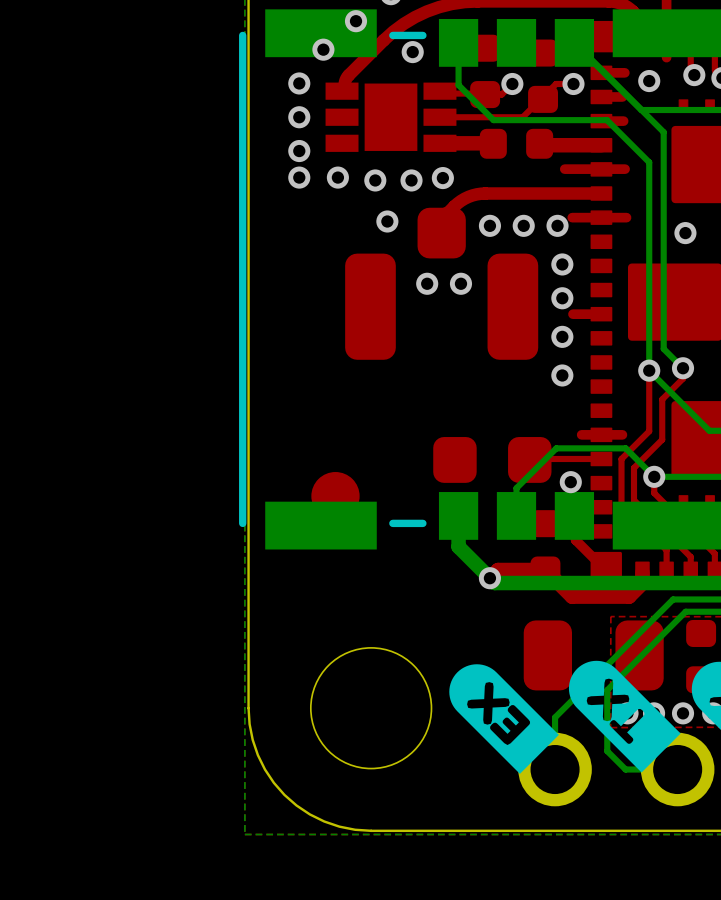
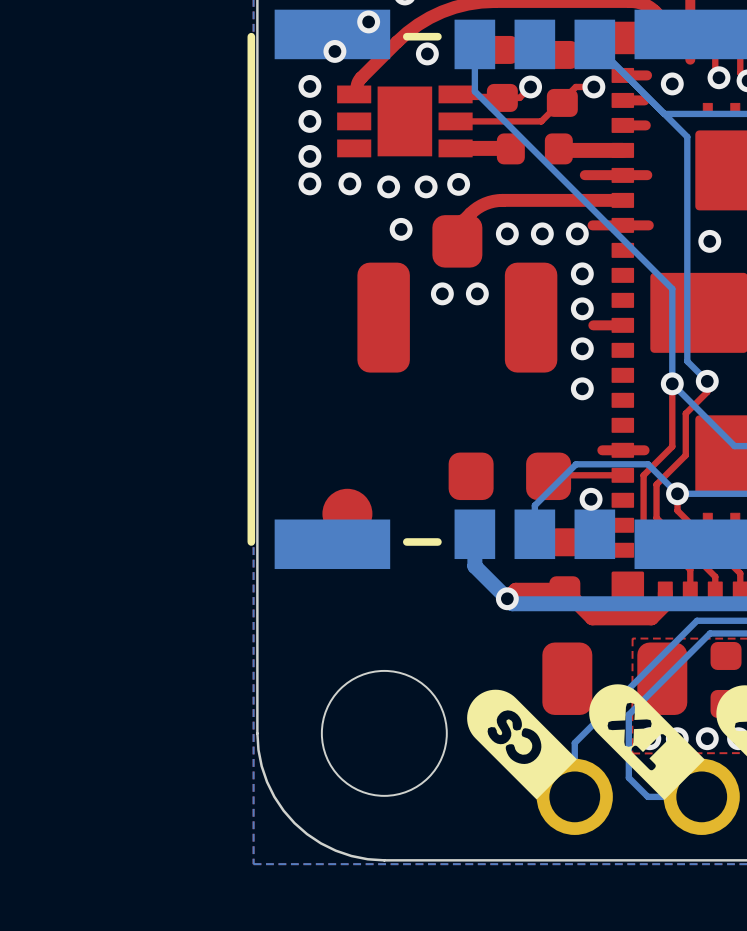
bottom track: (458, 85) (493, 120) (606, 120) (649, 162) (649, 278) -> (474, 88) (474, 91) (672, 288)
top track: (575, 535) (575, 540) (603, 567) (606, 567) -> none
drawing shape: [449, 664, 559, 774] -> [467, 689, 577, 800]

